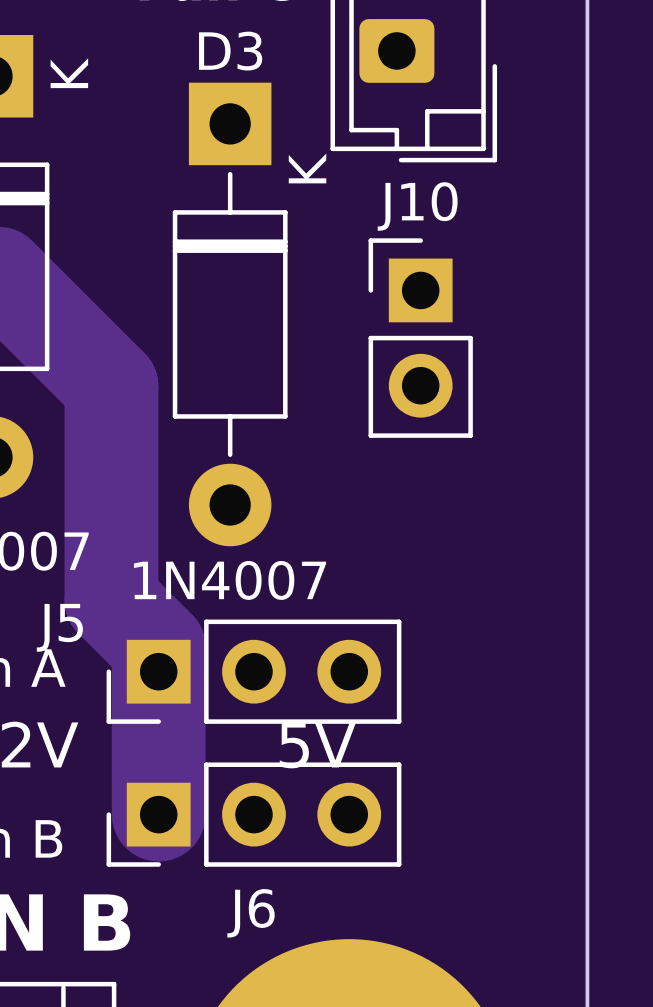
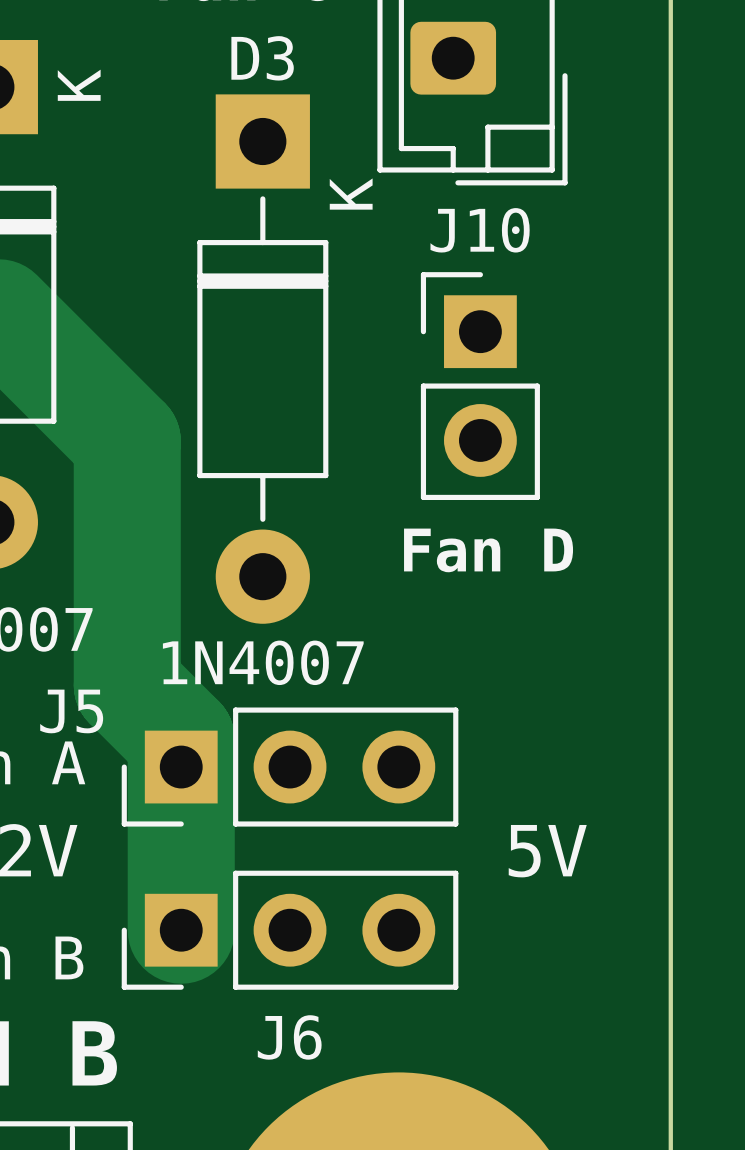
text: none -> Fan D (488, 550)

